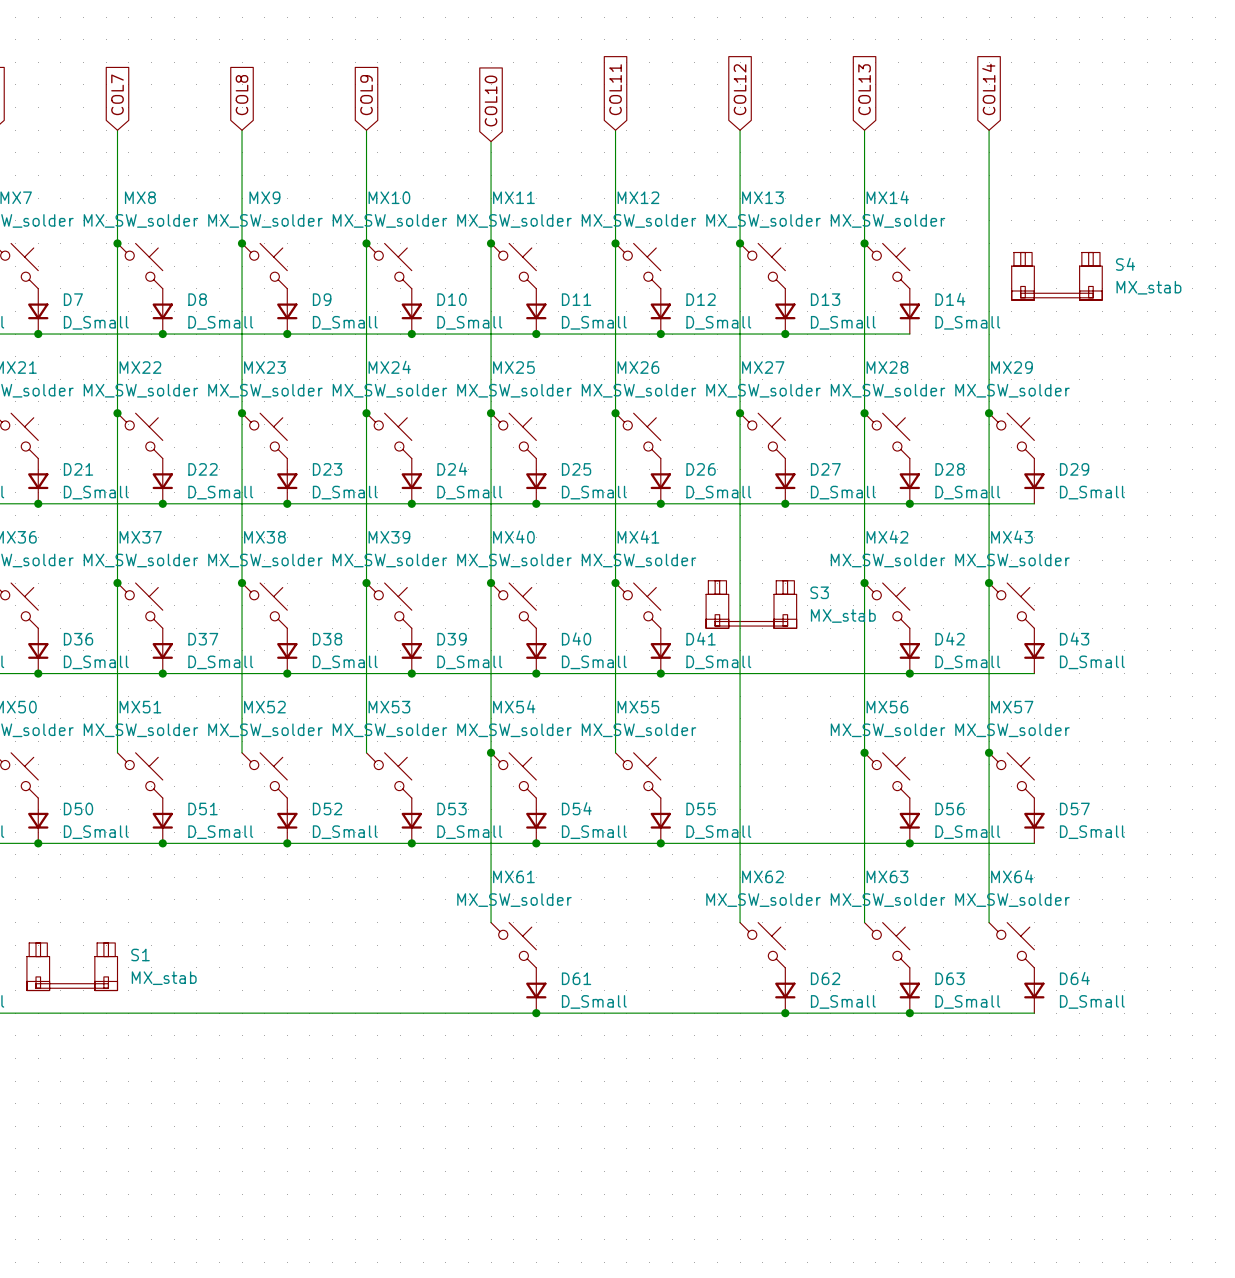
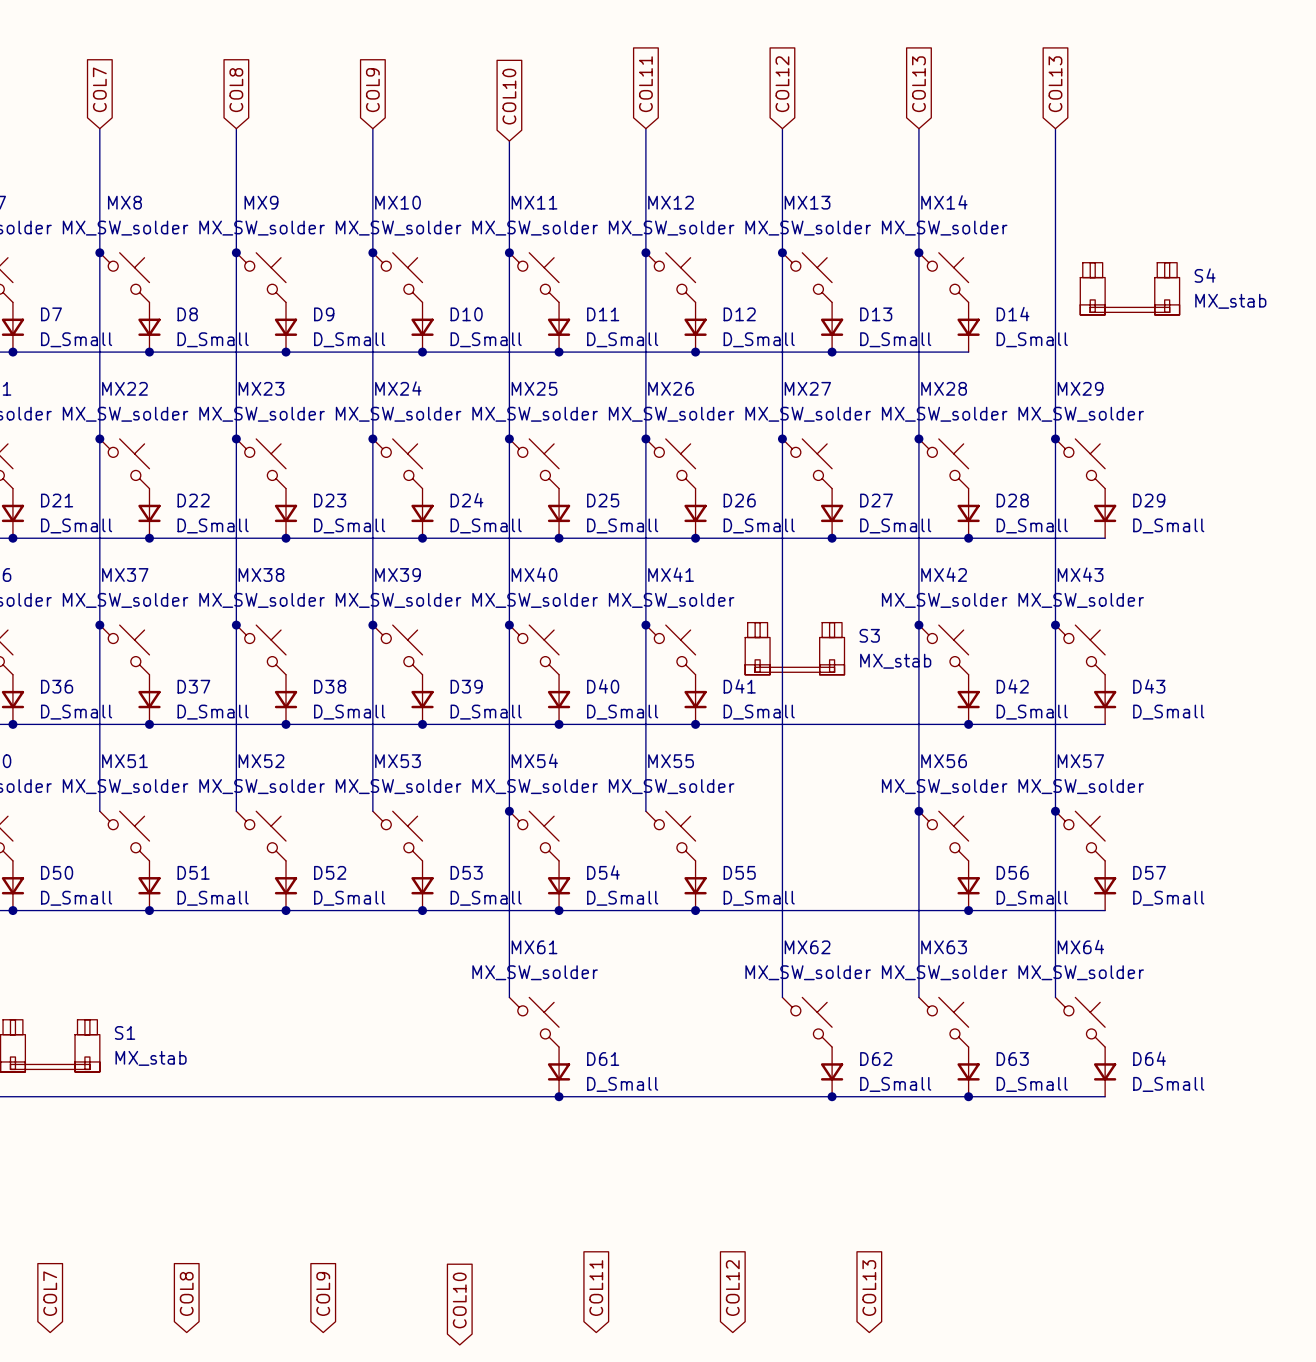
global label: COL14 (988, 89) -> COL13 (1055, 84)
global label: none -> COL11 (596, 1288)
global label: none -> COL12 (732, 1288)
global label: none -> COL13 (869, 1288)
global label: none -> COL7 (50, 1293)
global label: none -> COL8 (186, 1293)
global label: none -> COL9 (323, 1293)
global label: none -> COL10 (459, 1300)

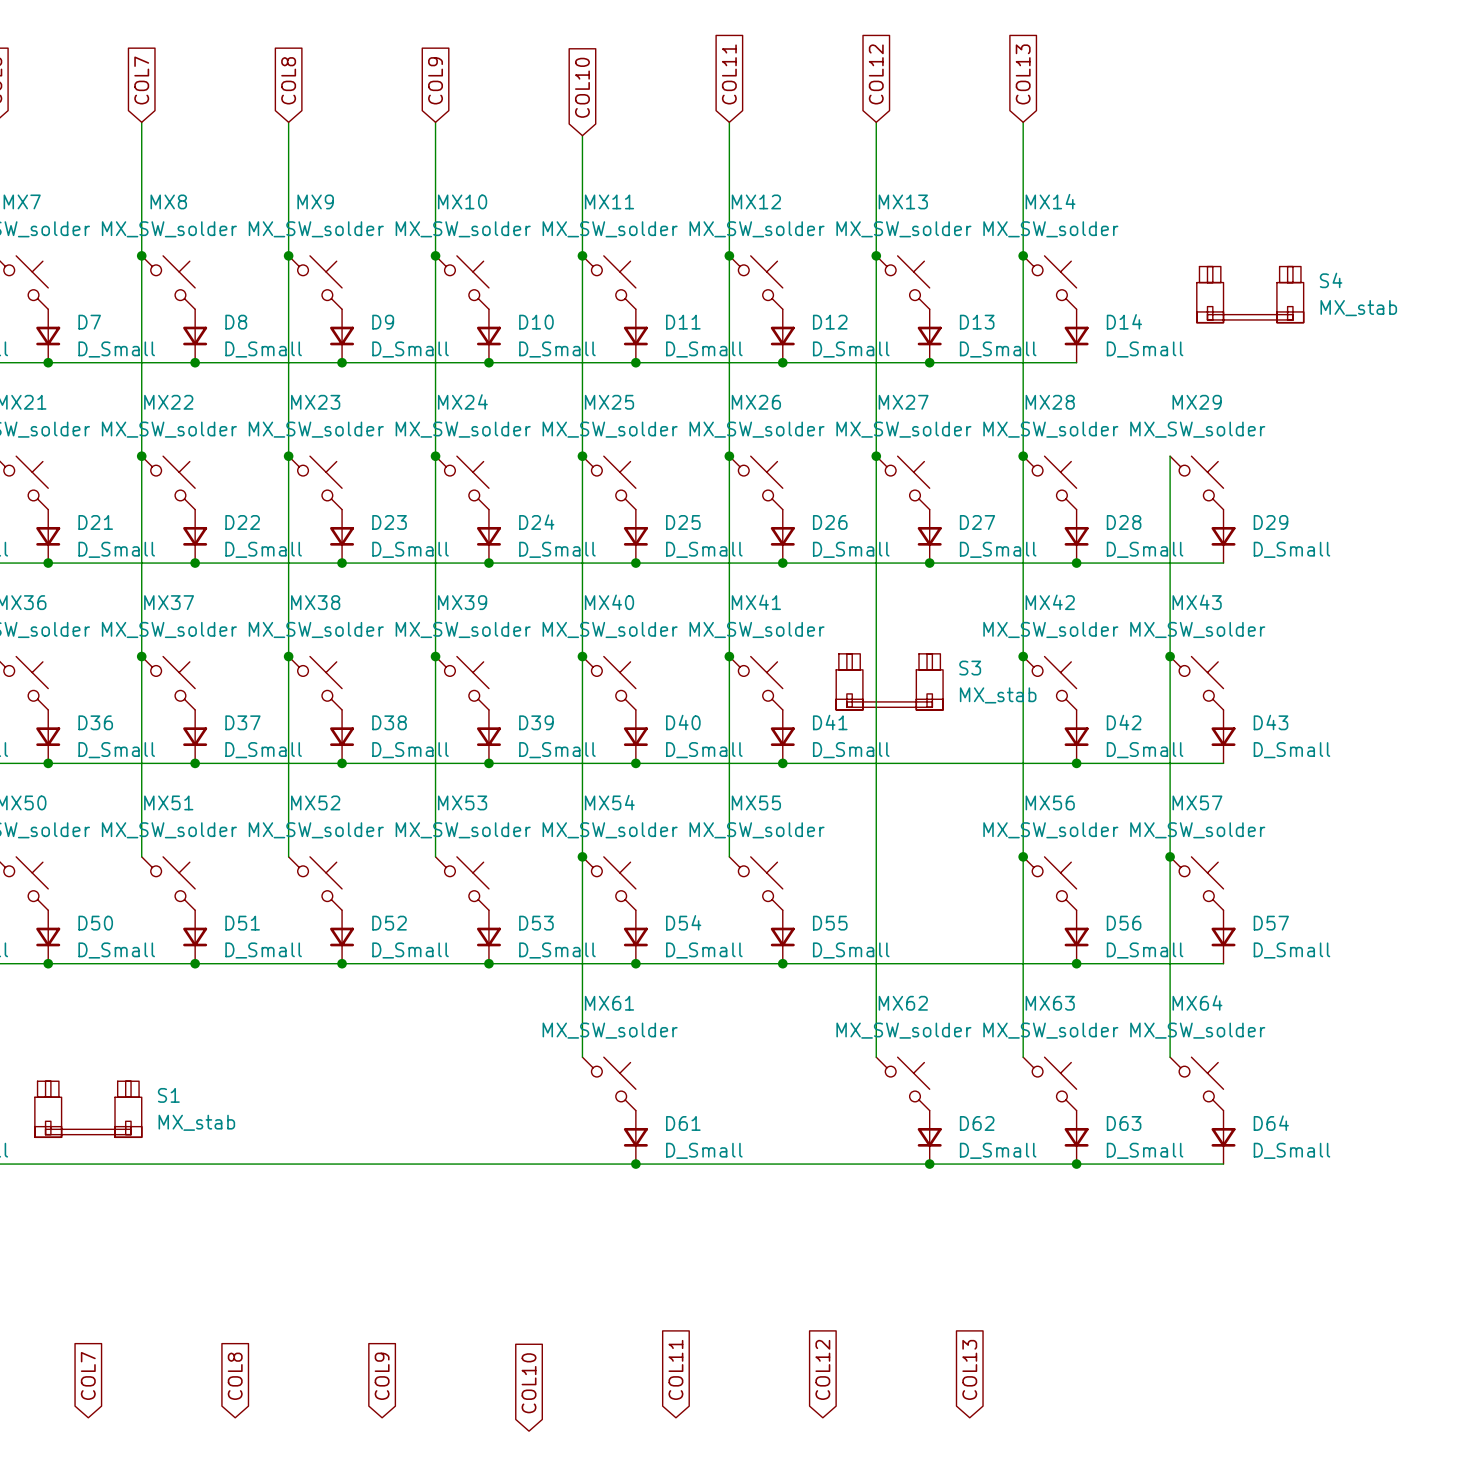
global label: COL13 (1055, 84) -> none
wire: (1055, 128) (1055, 438) -> none
junction: (1055, 438) -> none

